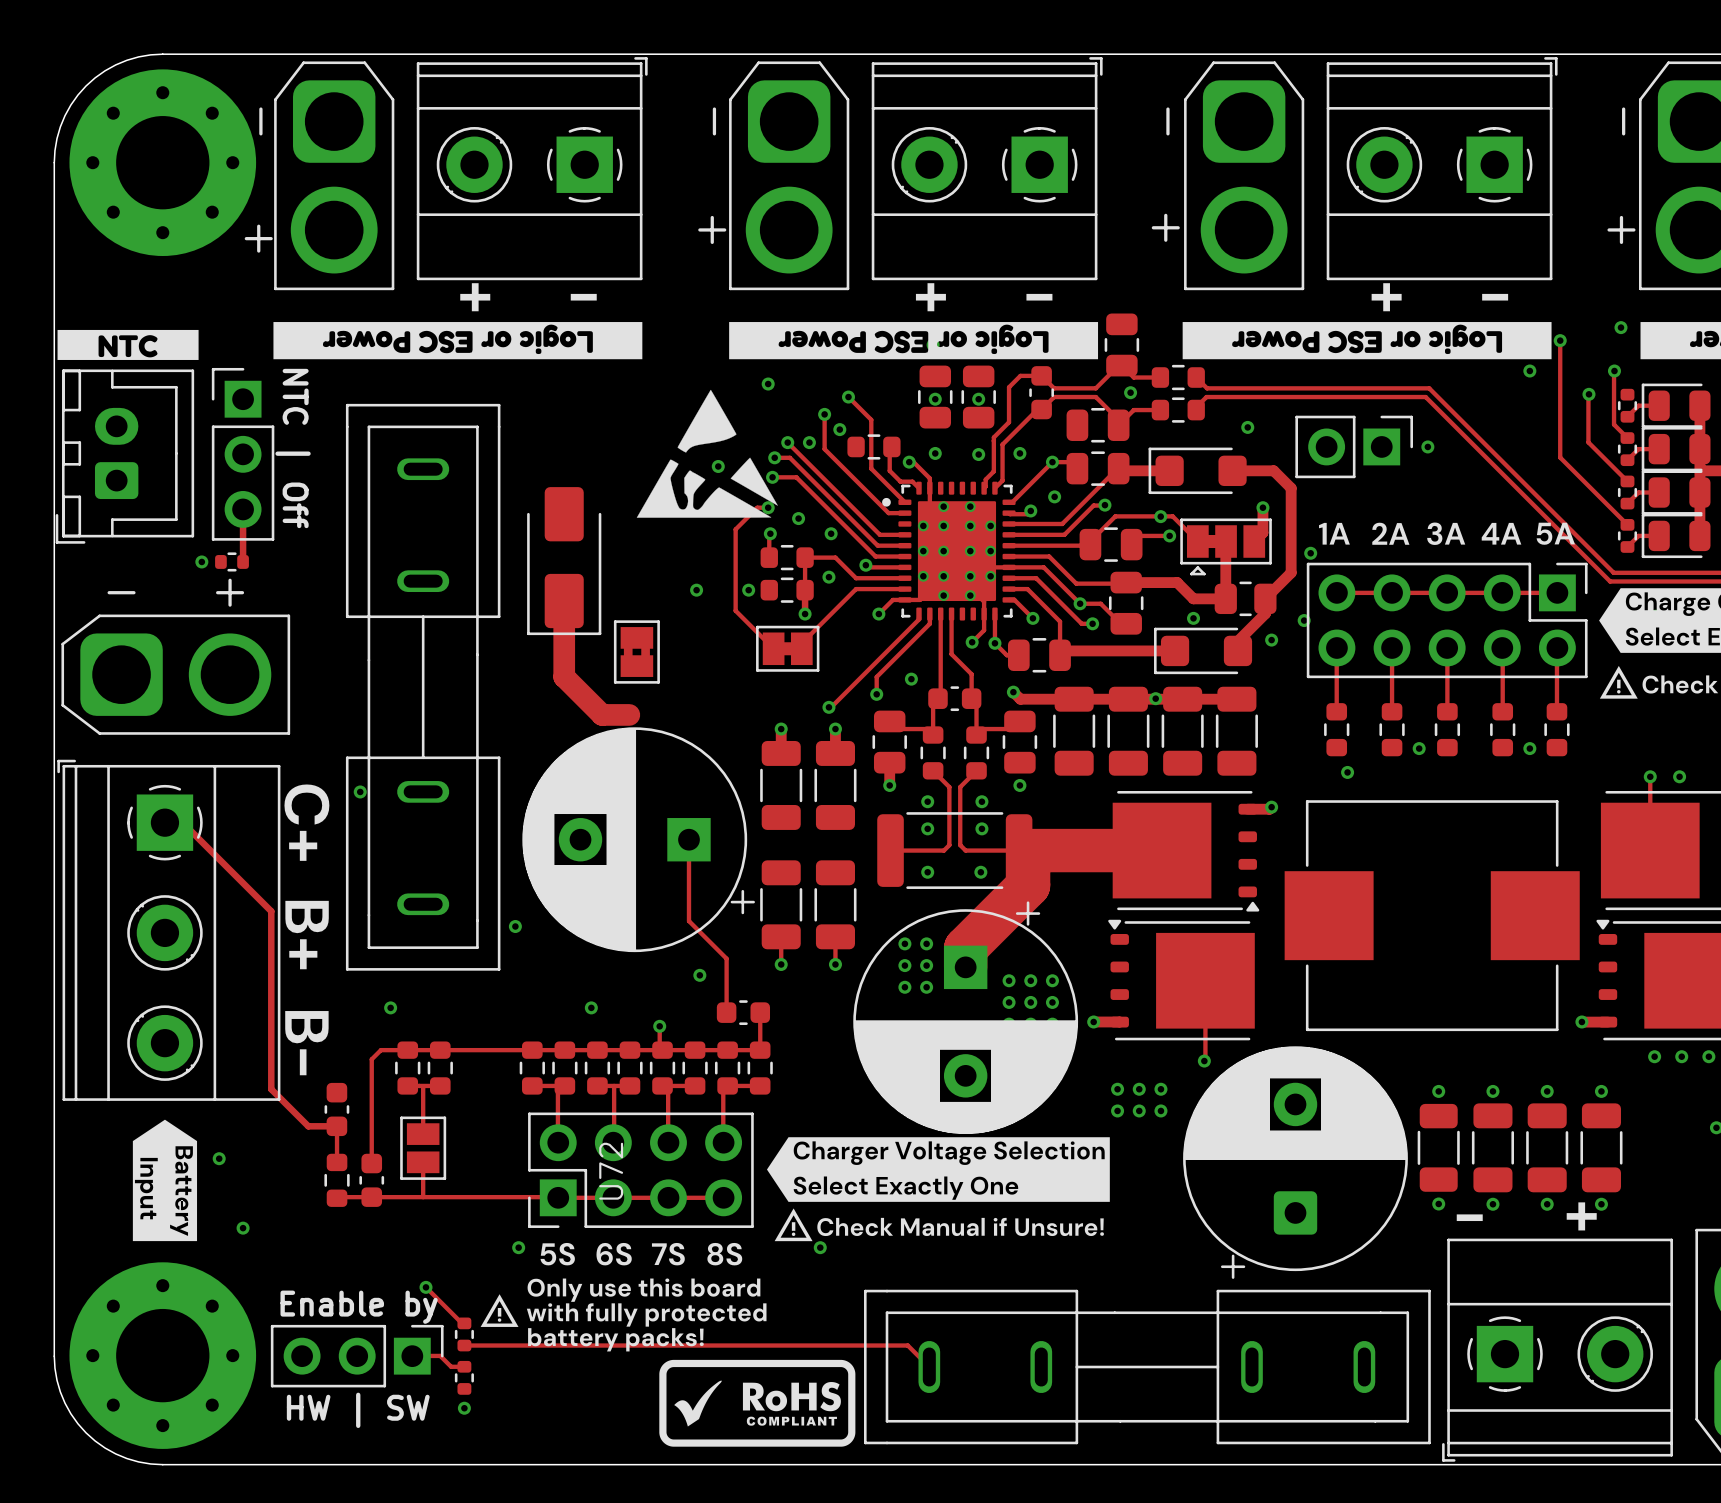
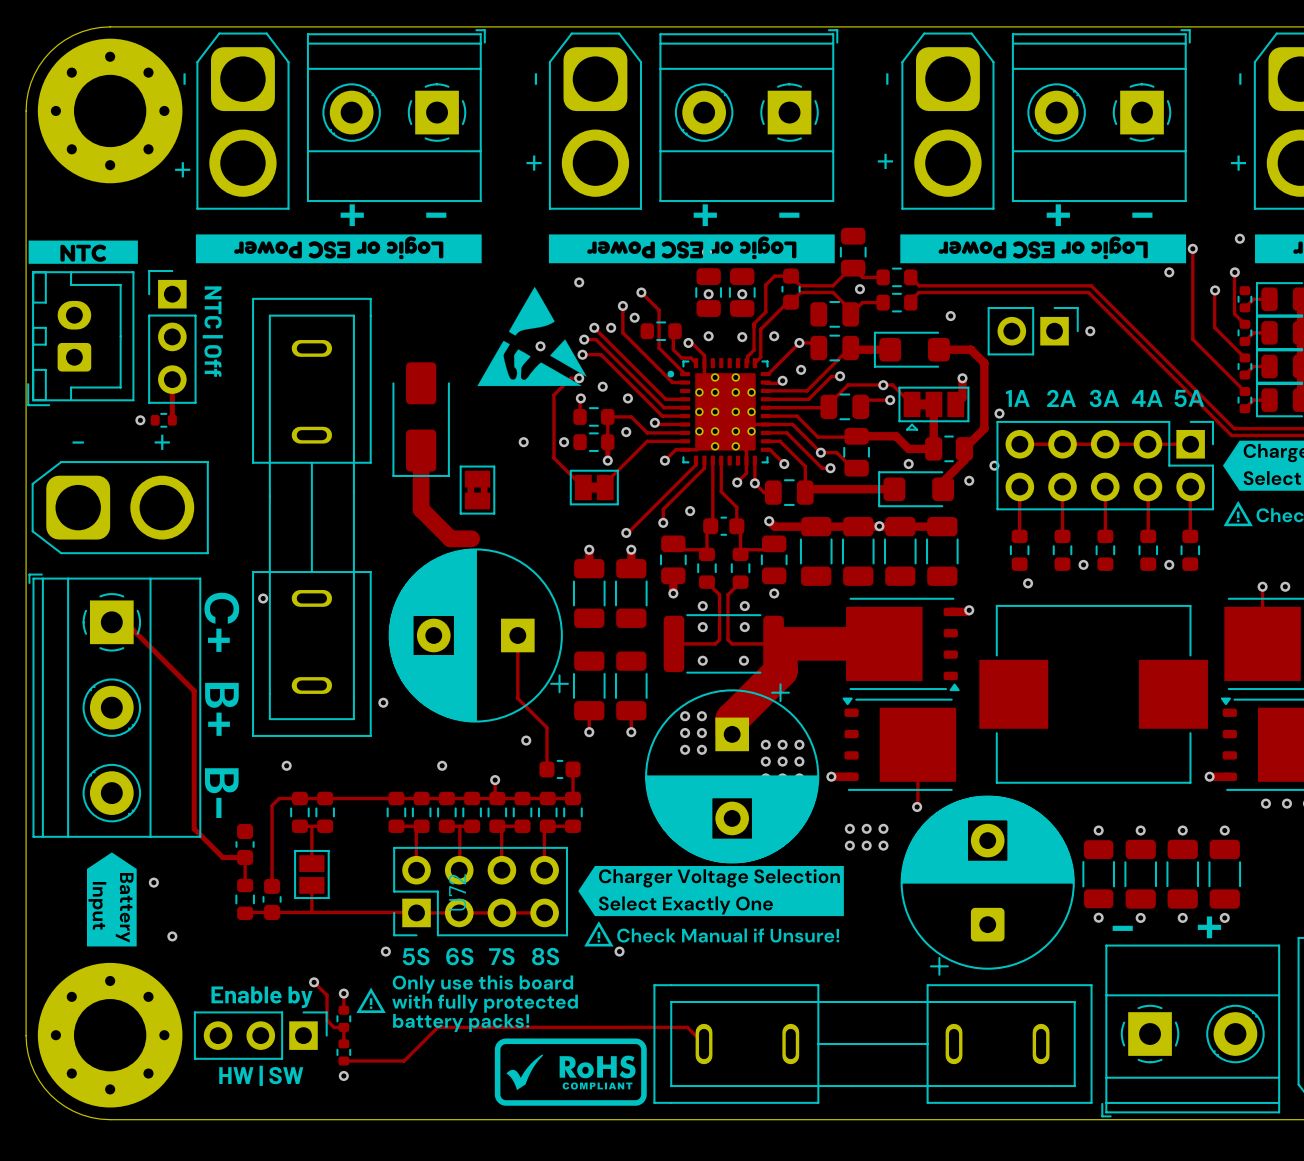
track: none -> (343, 993) (343, 1010)
via: none -> (343, 993)
track: (442, 1304) (462, 1323) -> (327, 995) (327, 1020) (333, 1027) (343, 1027) (343, 1043)
track: (464, 1345) (585, 1345) -> (343, 1061) (404, 1061) (437, 1027)
track: (412, 1355) (440, 1355) (451, 1366) (464, 1366) -> none

